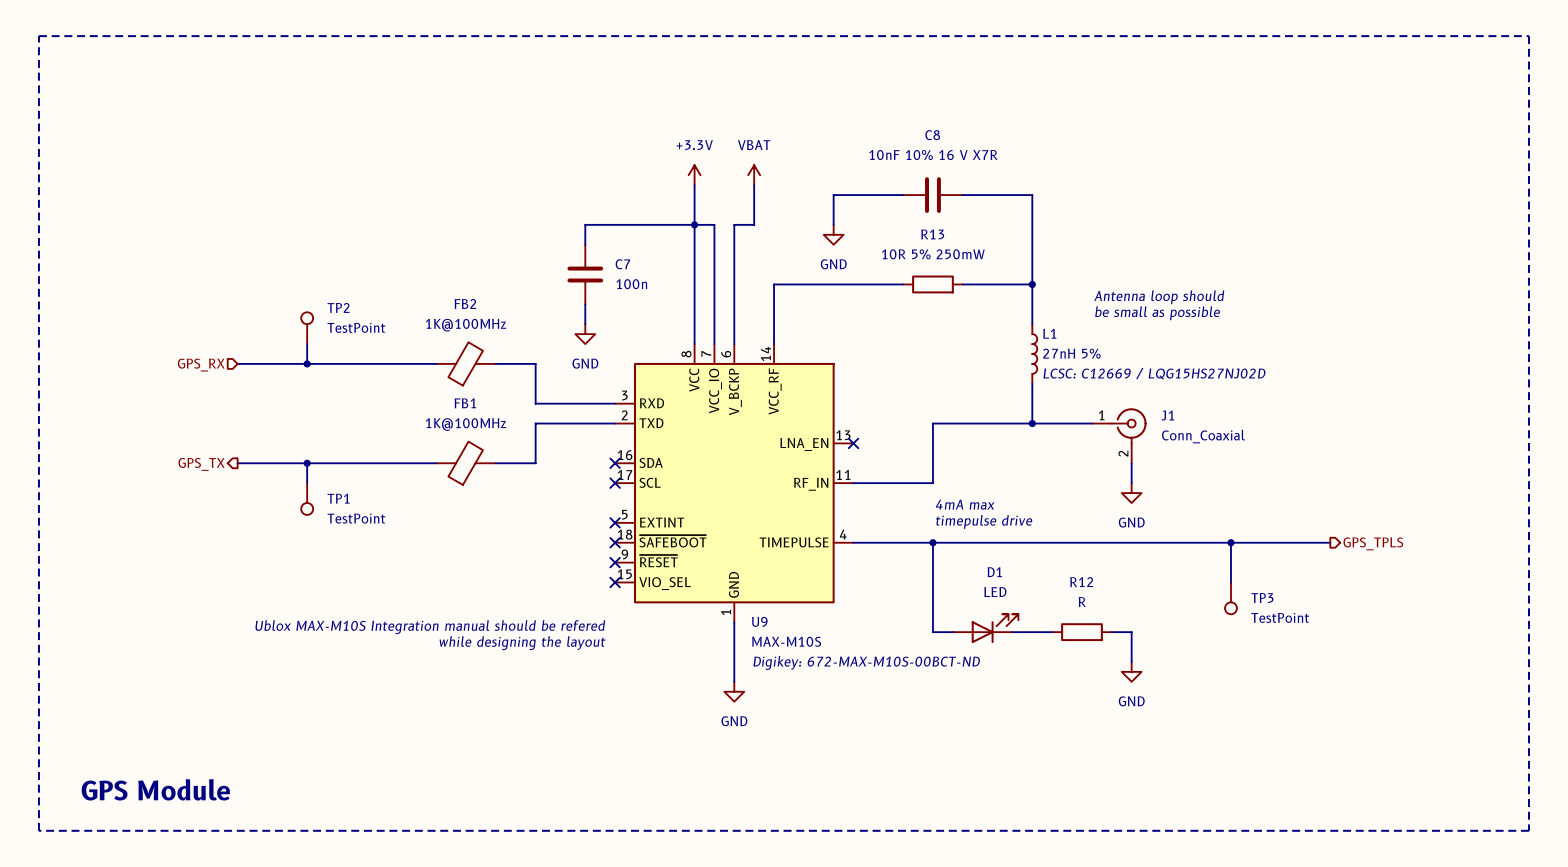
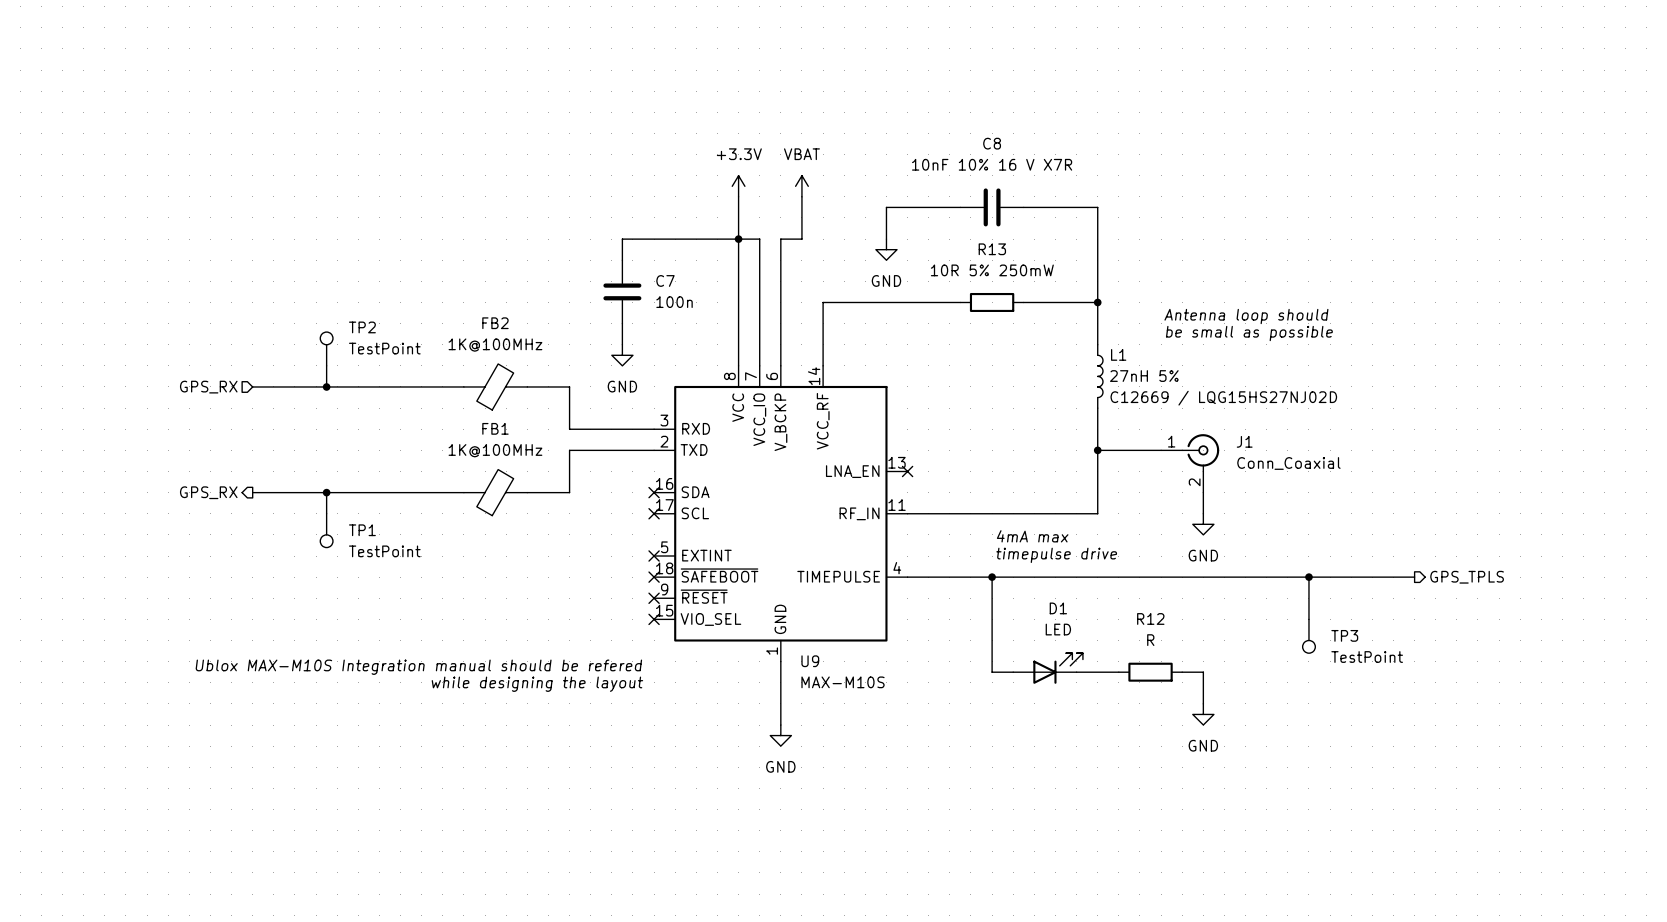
line: (38, 36) (1528, 36) (1528, 830) (38, 830) (38, 36) -> none
L1 text: LCSC: C12669 / LQG15HS27NJ02D (1154, 373) -> C12669 / LQG15HS27NJ02D (1223, 398)
wire: (1032, 423) (932, 423) (932, 483) -> (1097, 450) (1097, 513) (992, 513)
hierarchical label: GPS_TX (201, 464) -> GPS_RX (208, 492)
U9 text: Digikey: 672-MAX-M10S-00BCT-ND (866, 662) -> none
text: GPS Module (155, 789) -> none

